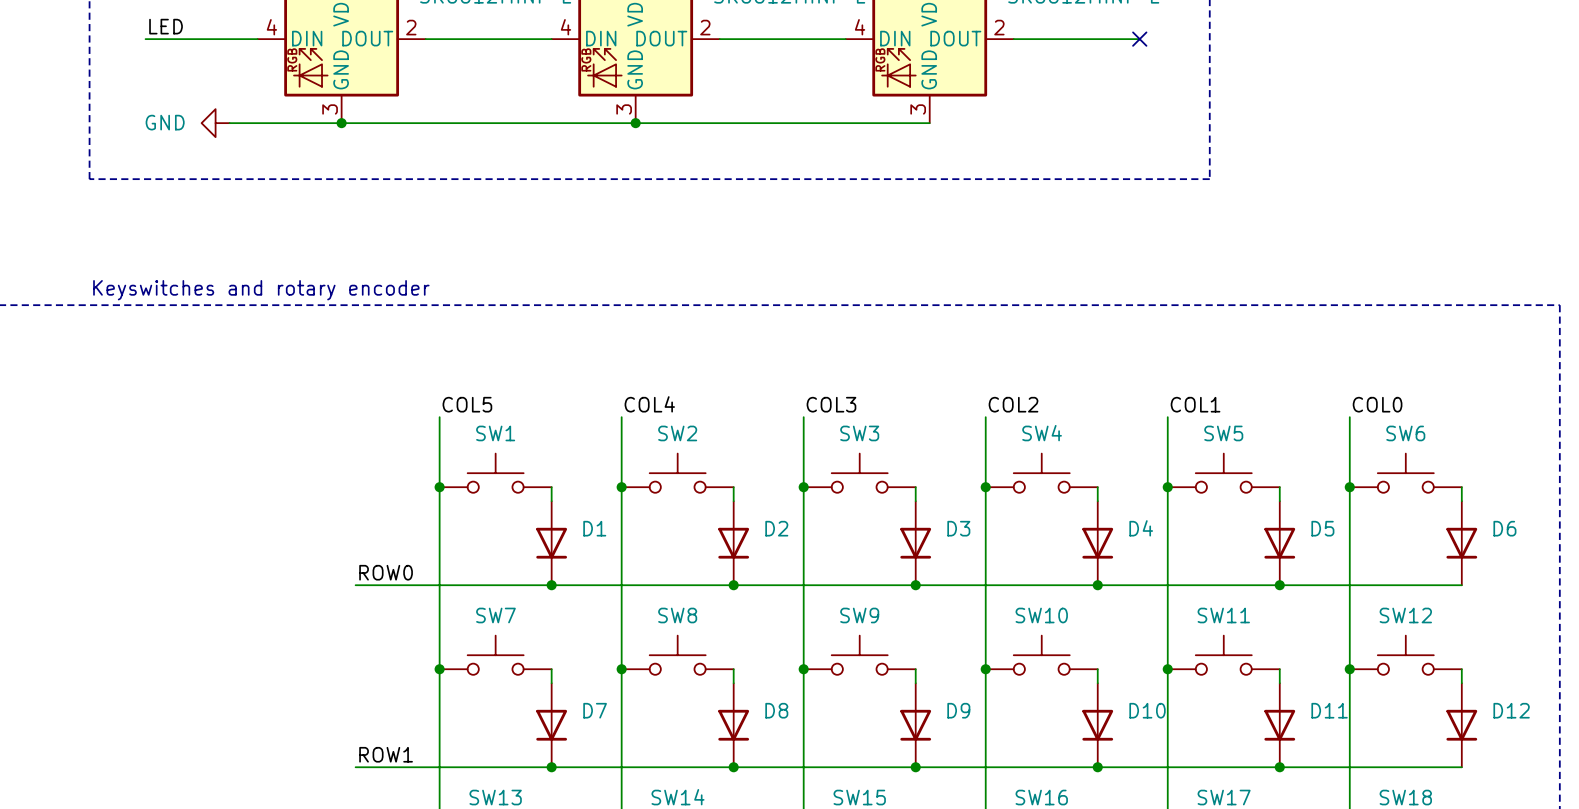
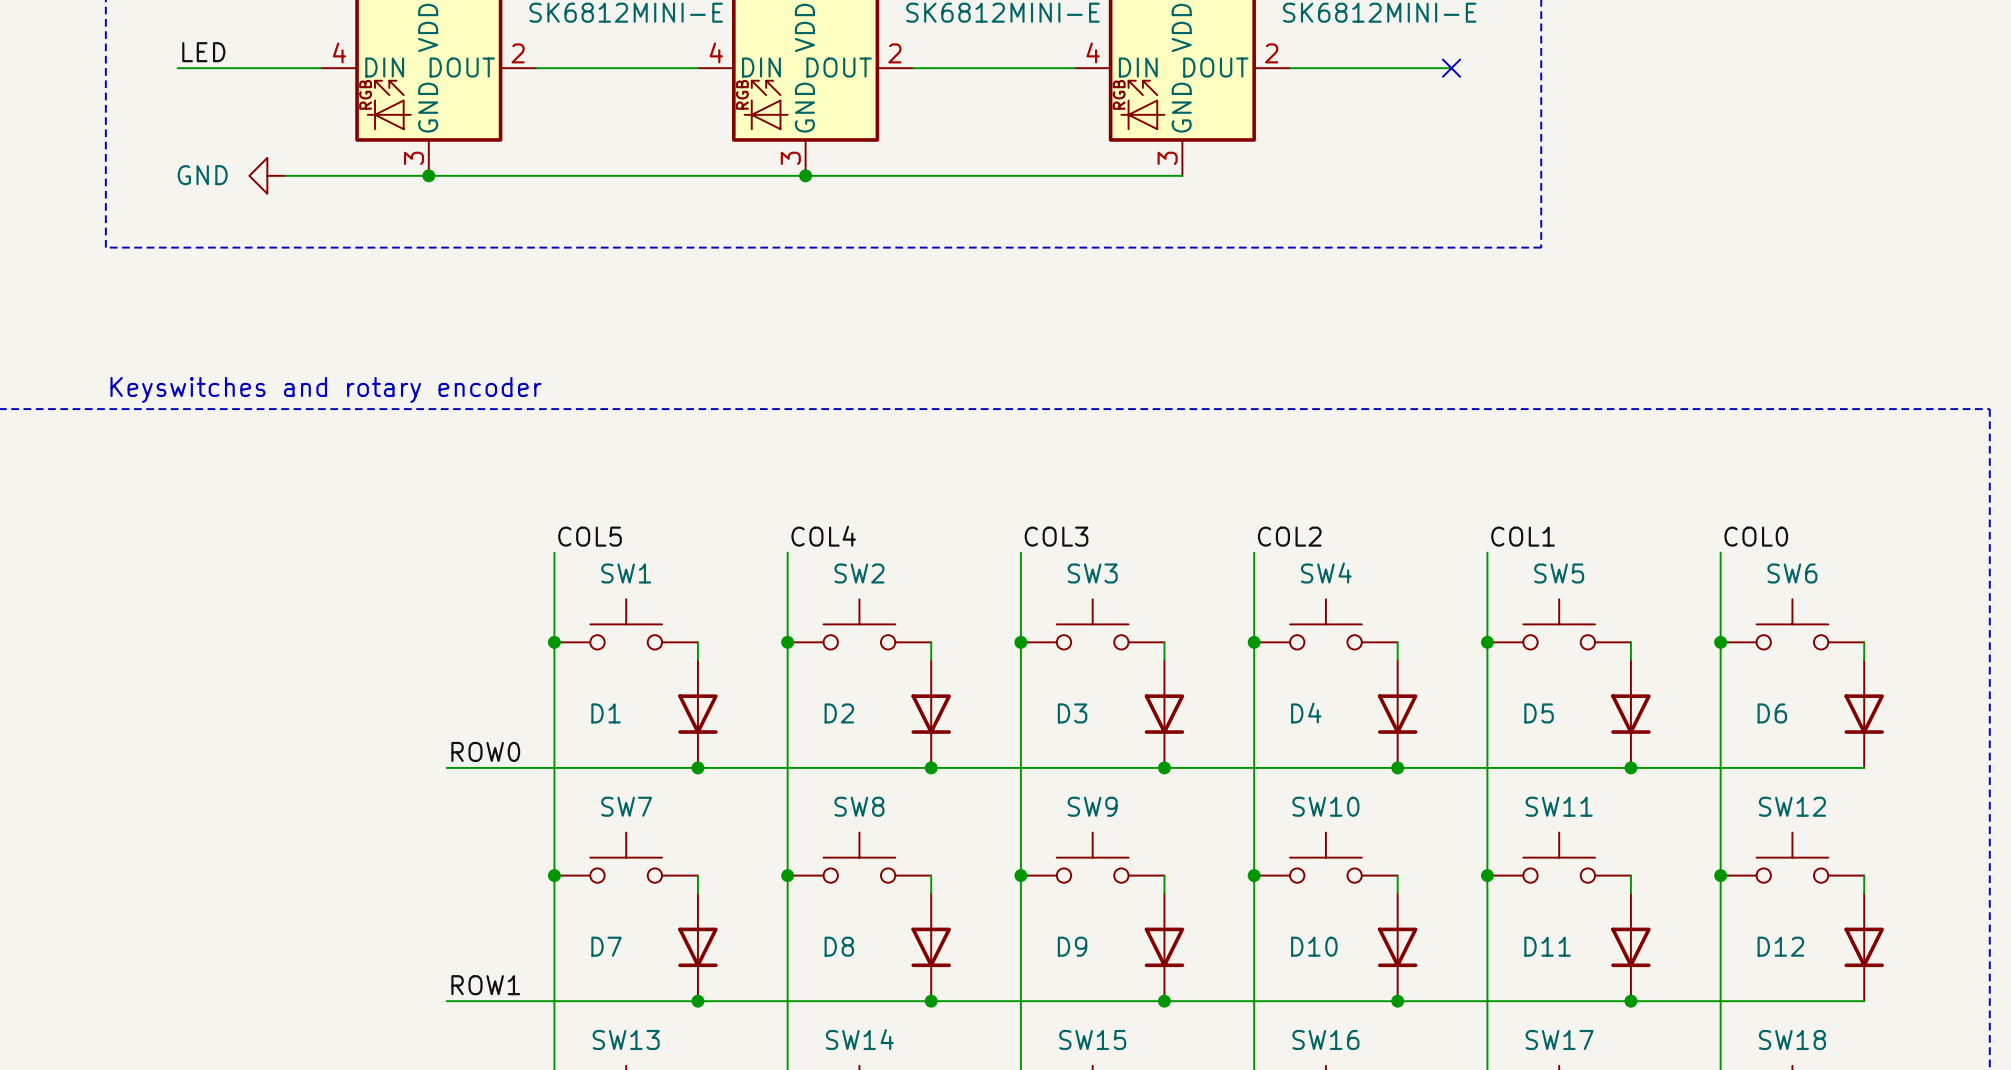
D1 name position: D1 (594, 528) -> D1 (606, 713)
D2 name position: D2 (776, 528) -> D2 (839, 713)
D3 name position: D3 (958, 528) -> D3 (1072, 713)
D4 name position: D4 (1141, 528) -> D4 (1306, 713)
D5 name position: D5 (1322, 528) -> D5 (1539, 713)
D6 name position: D6 (1504, 528) -> D6 (1772, 713)
D7 name position: D7 (595, 710) -> D7 (606, 946)
D8 name position: D8 (776, 710) -> D8 (839, 946)
D9 name position: D9 (958, 710) -> D9 (1072, 946)
D10 name position: D10 (1147, 710) -> D10 (1314, 946)
D11 name position: D11 (1329, 710) -> D11 (1547, 946)
D12 name position: D12 (1511, 710) -> D12 (1780, 946)

